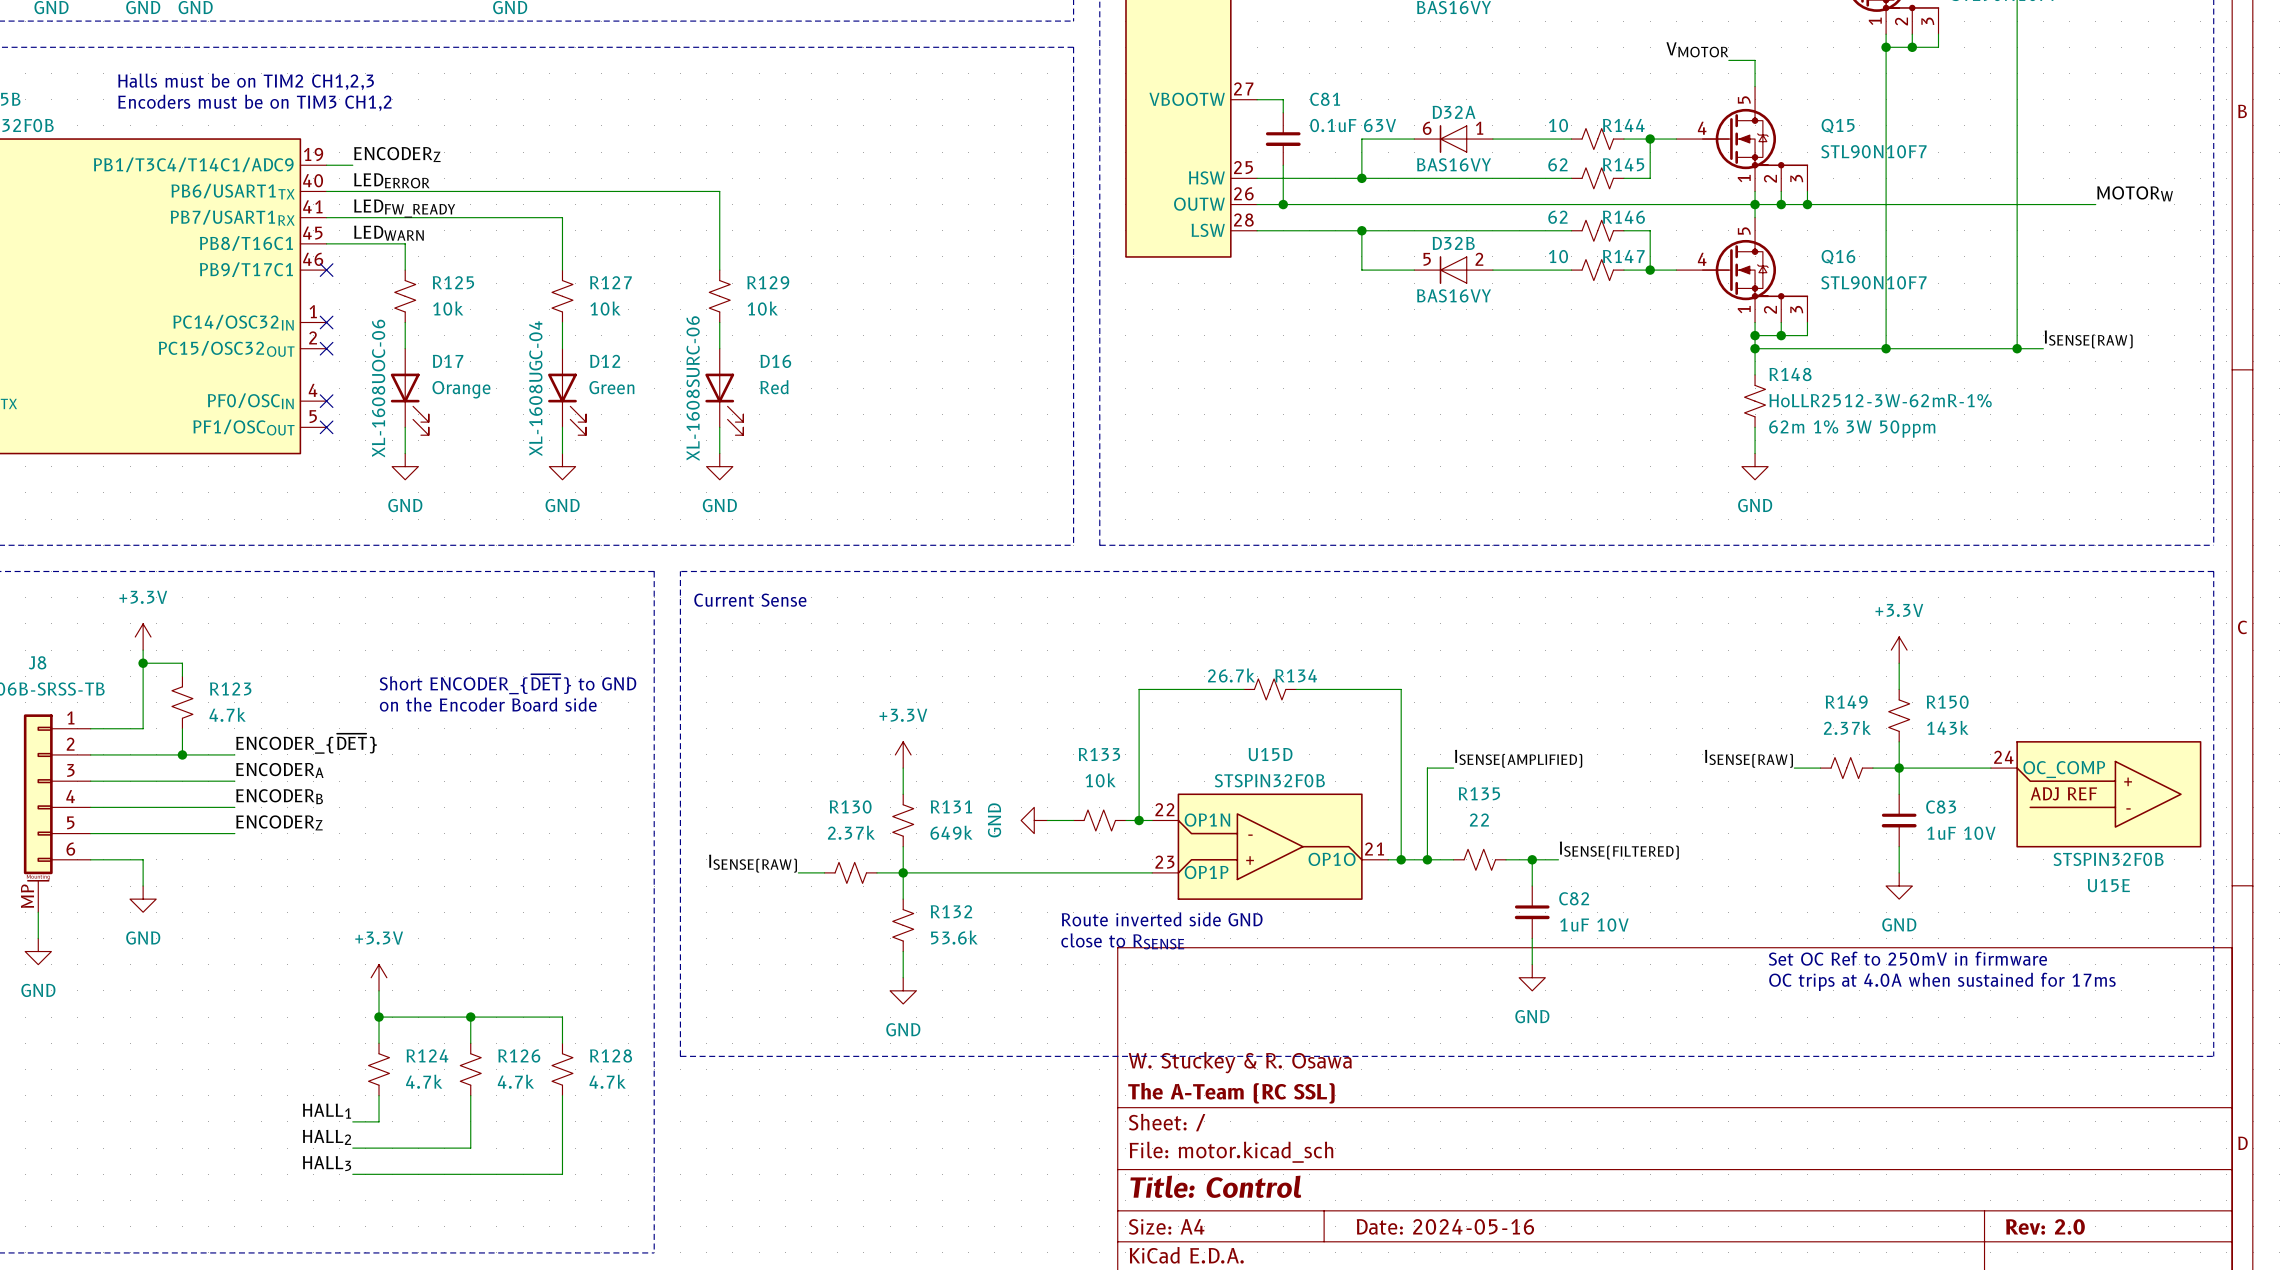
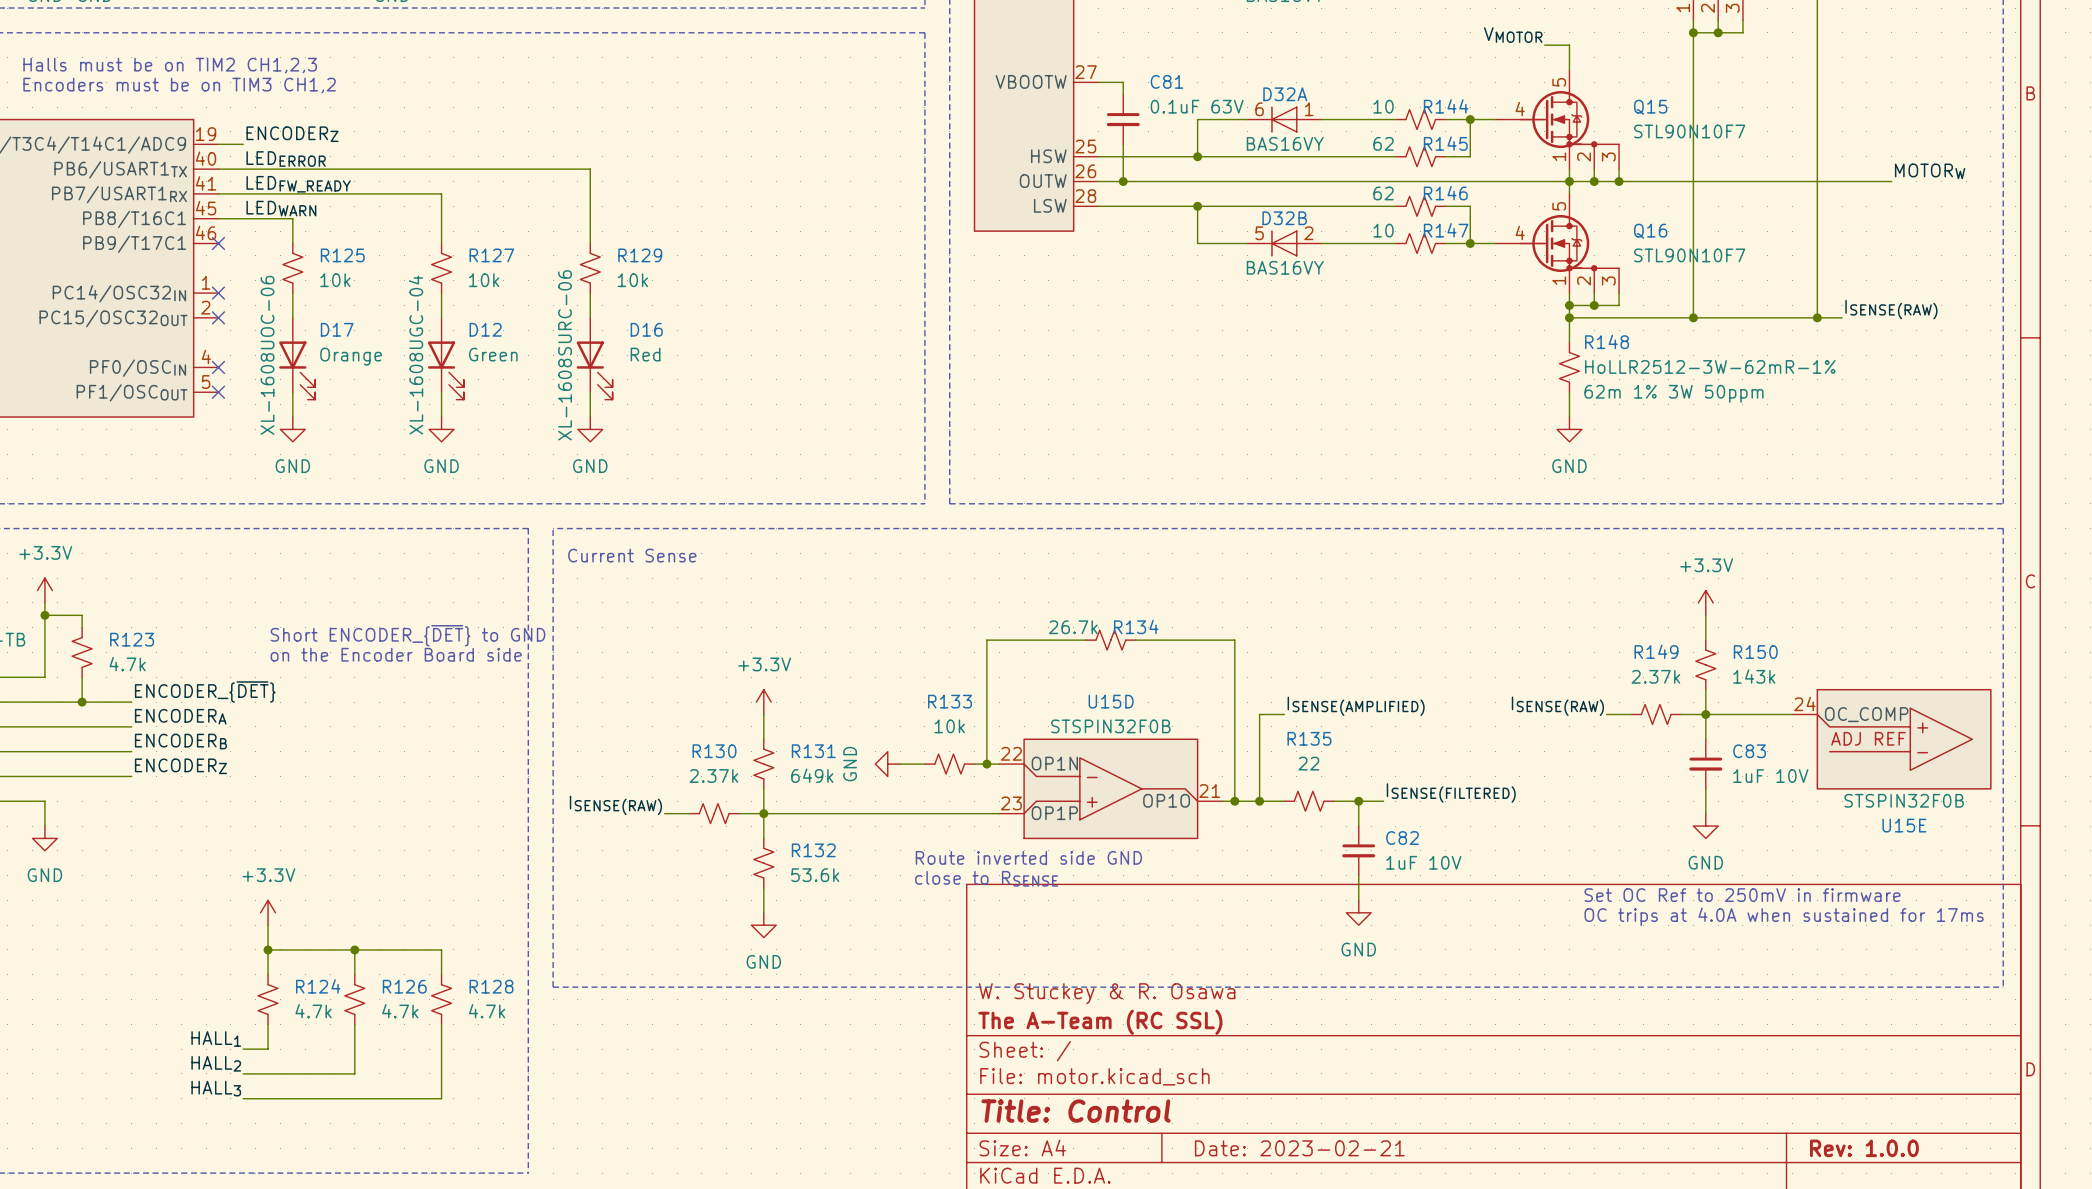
title block: Date: 2024-05-16 (1445, 1226) -> Date: 2023-02-21 (1299, 1148)
title block: Rev: 2.0 (2045, 1226) -> Rev: 1.0.0 (1864, 1148)

